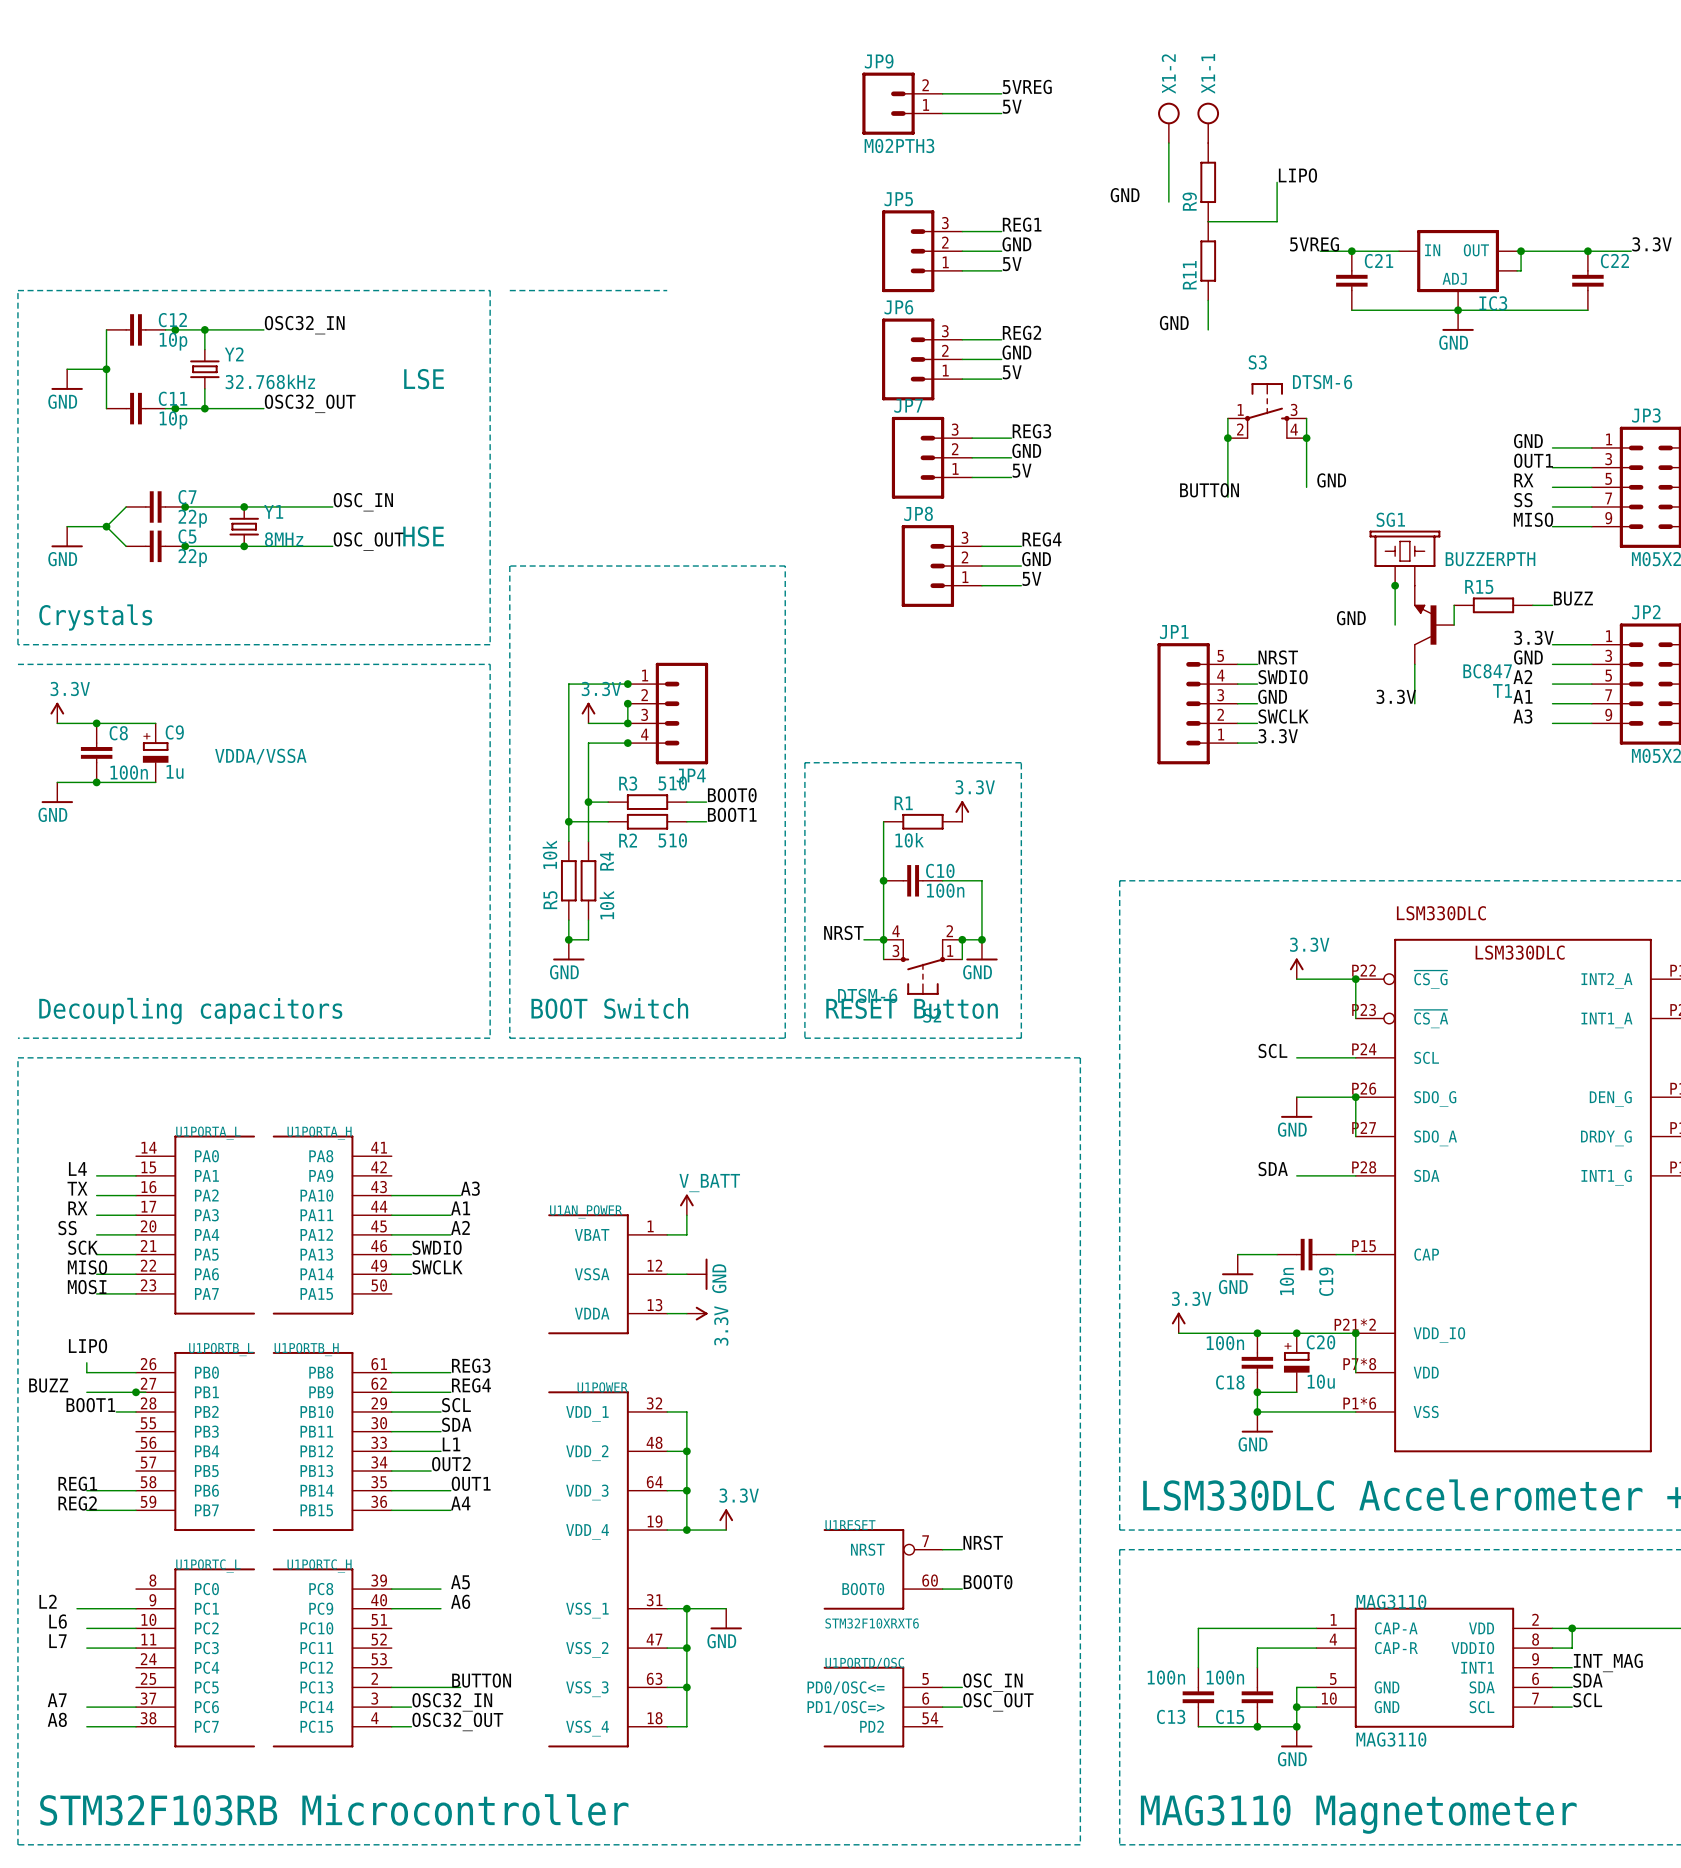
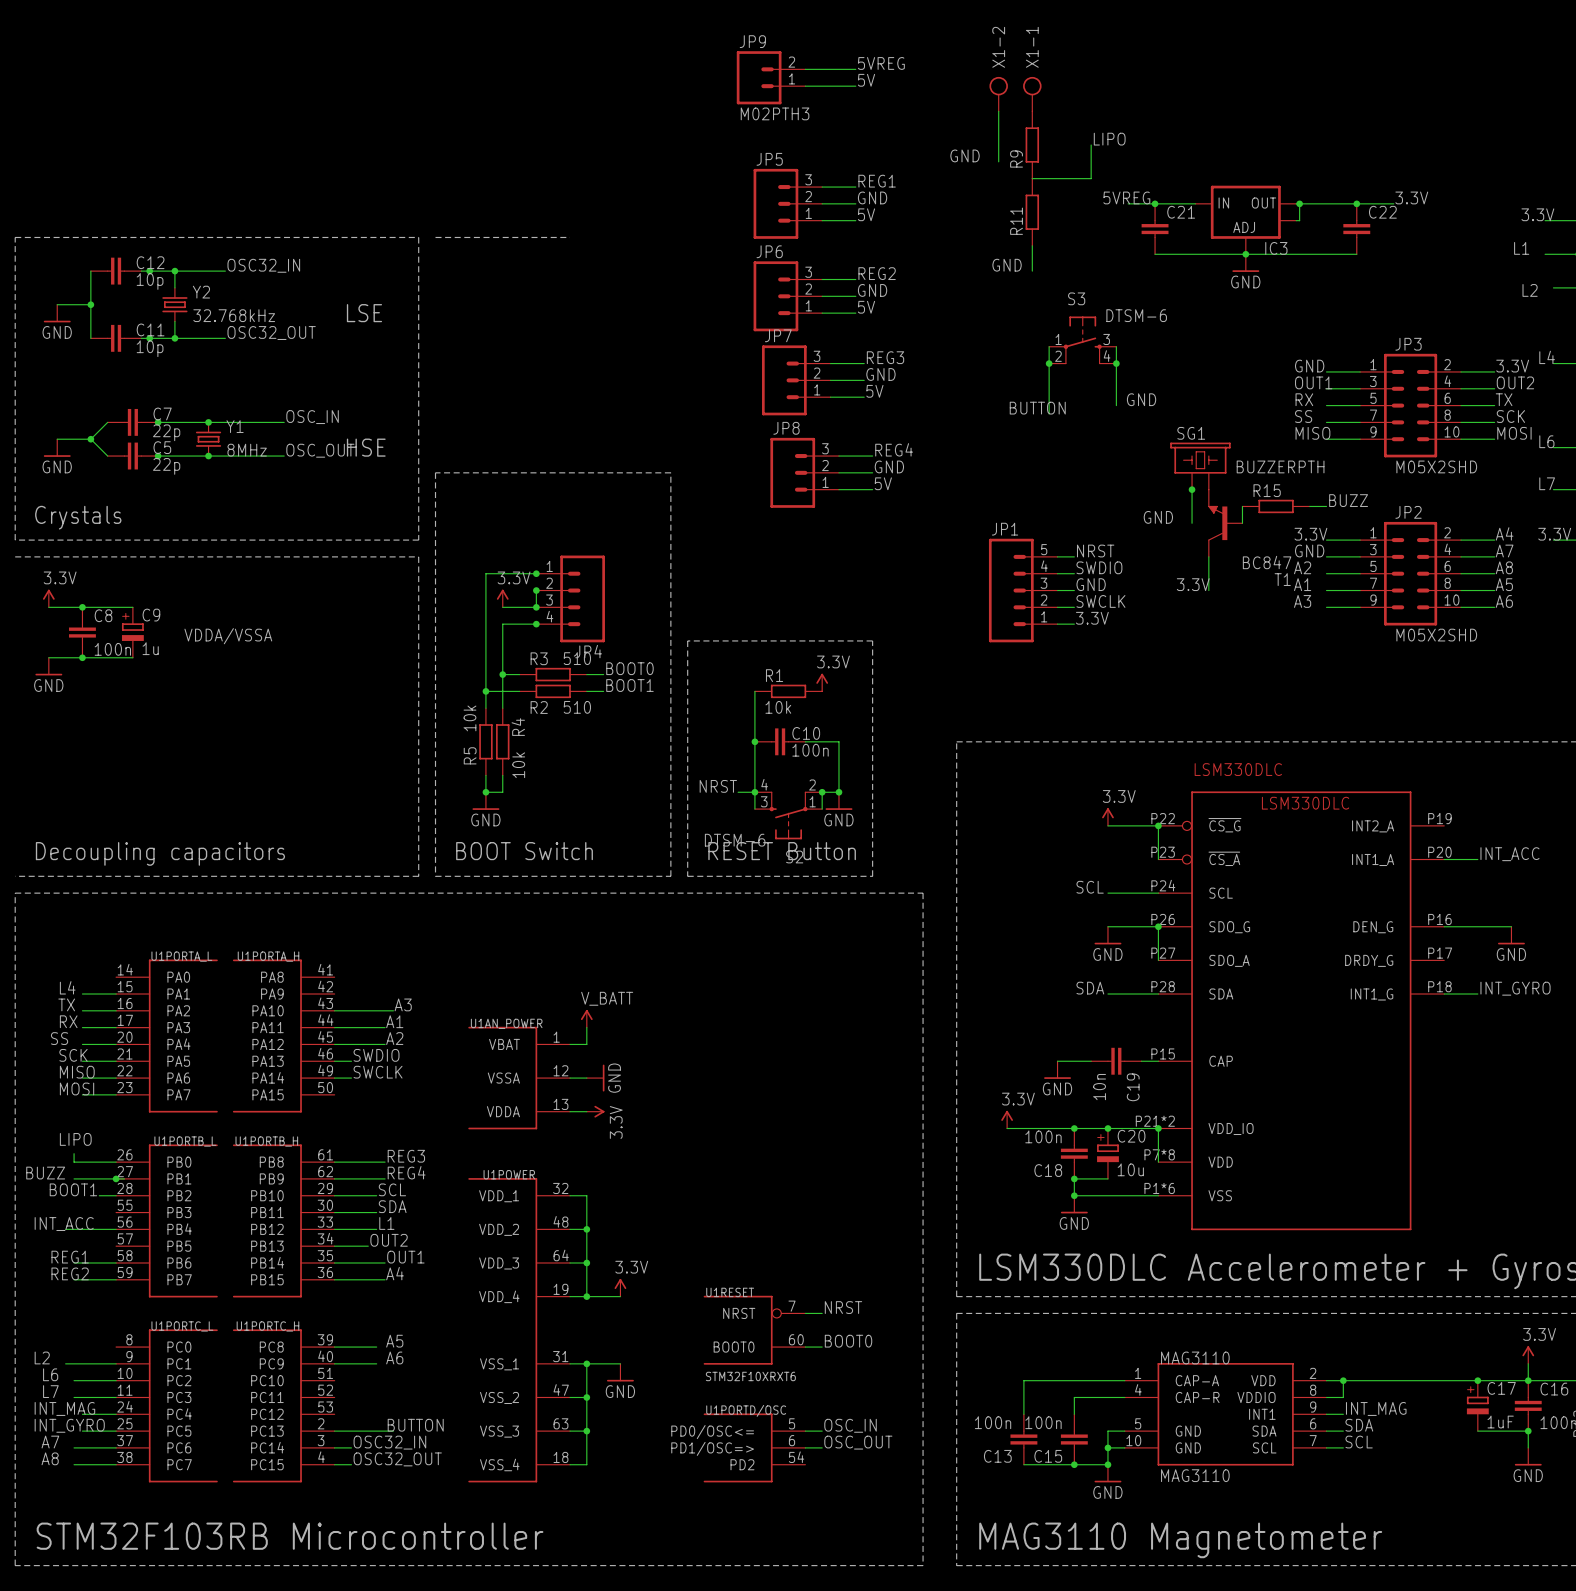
label: none -> INT_ACC (64, 1224)
wire: none -> (65, 1229) (116, 1229)
label: none -> INT_MAG (64, 1408)
wire: none -> (82, 1414) (116, 1414)
label: none -> INT_GYRO (69, 1425)
wire: none -> (82, 1431) (116, 1431)

